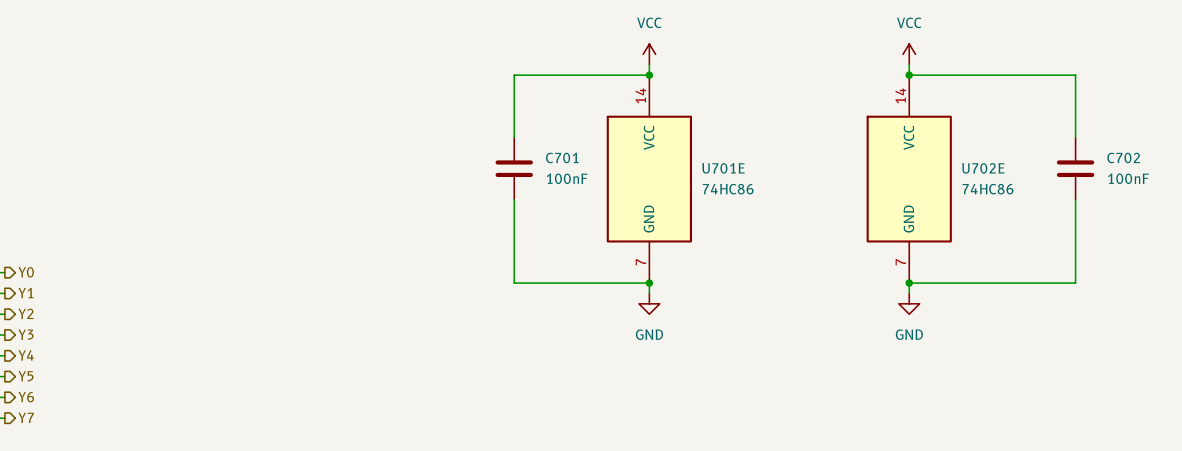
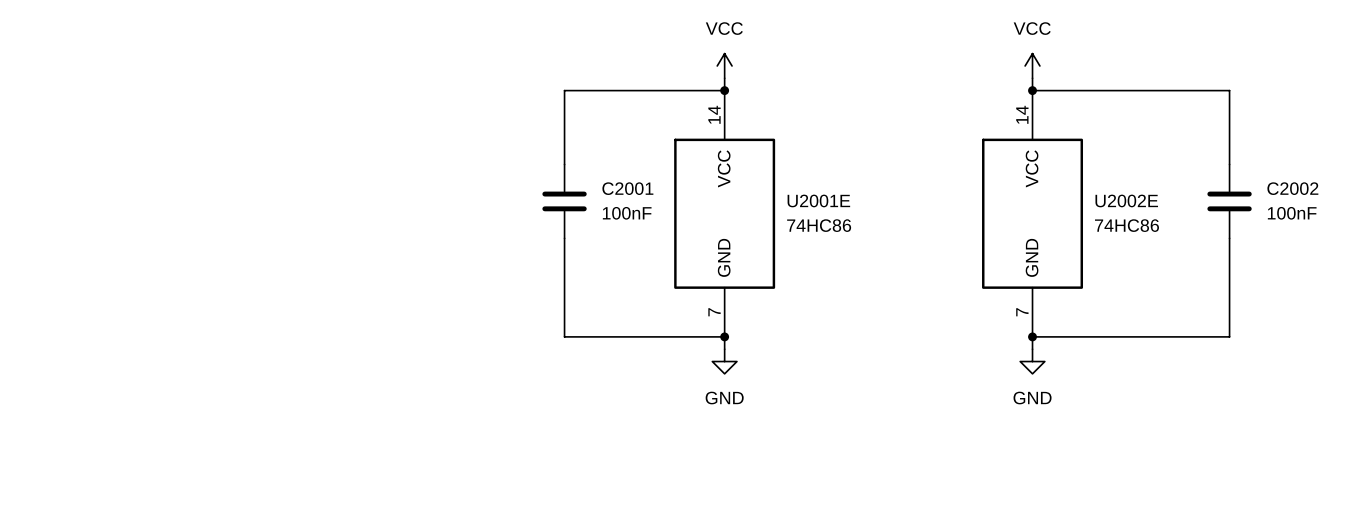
C701 name: C701 (562, 157) -> C2001 (627, 188)
C702 name: C702 (1123, 157) -> C2002 (1292, 188)
U701E name: U701E (723, 168) -> U2001E (818, 200)
U702E name: U702E (983, 168) -> U2002E (1126, 200)

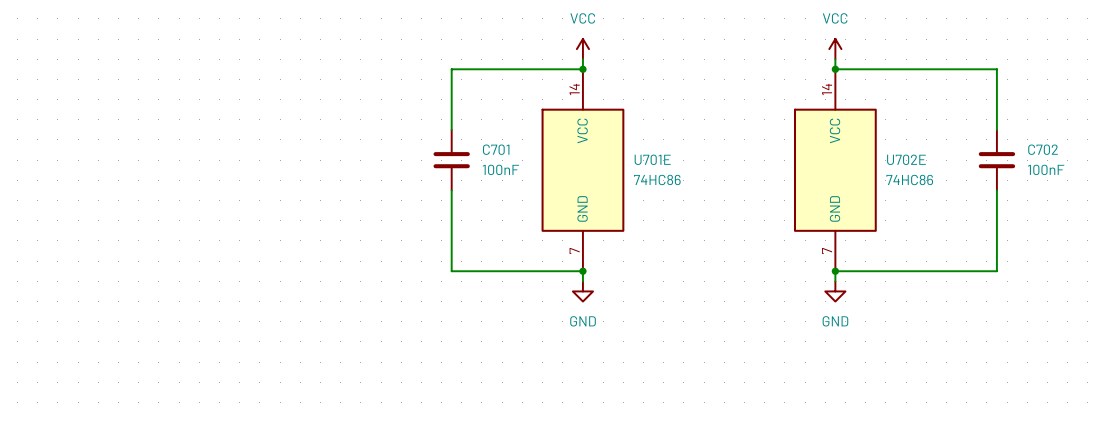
C2001 name: C2001 (627, 188) -> C701 (496, 149)
C2002 name: C2002 (1292, 188) -> C702 (1043, 149)
U2001E name: U2001E (818, 200) -> U701E (652, 159)
U2002E name: U2002E (1126, 200) -> U702E (906, 159)

